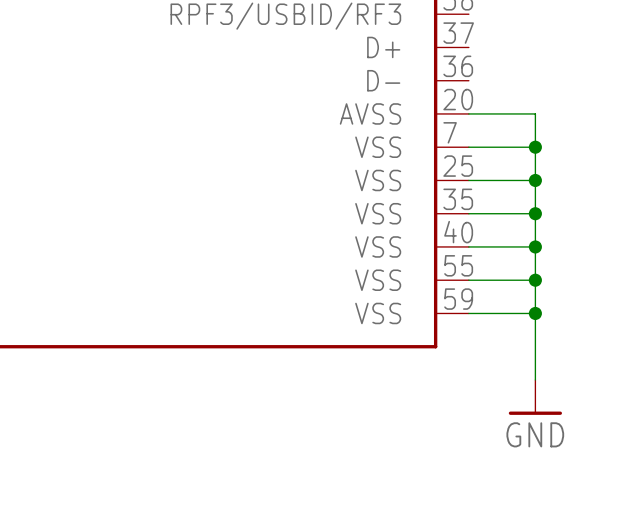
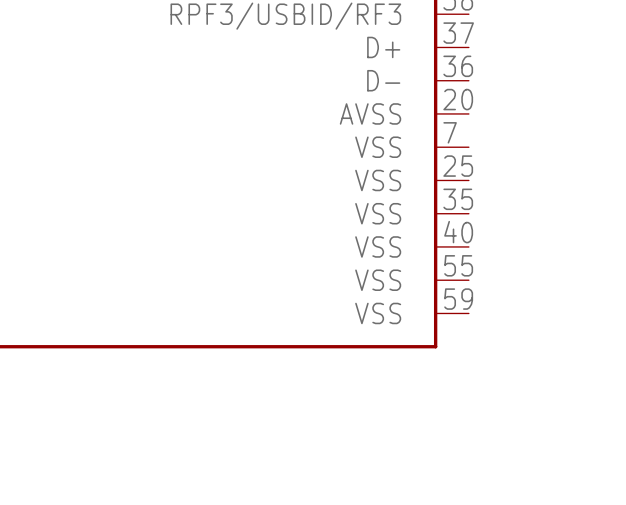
wire: (468, 113) (535, 113) (535, 379) -> none
wire: (468, 147) (535, 147) -> none
junction: (535, 147) -> none
wire: (468, 180) (535, 180) -> none
junction: (535, 180) -> none
wire: (468, 213) (535, 213) -> none
junction: (535, 213) -> none
wire: (468, 246) (535, 246) -> none
junction: (535, 246) -> none
wire: (468, 280) (535, 280) -> none
junction: (535, 280) -> none
wire: (468, 313) (535, 313) -> none
junction: (535, 313) -> none
power symbol: GND (535, 397) -> none

